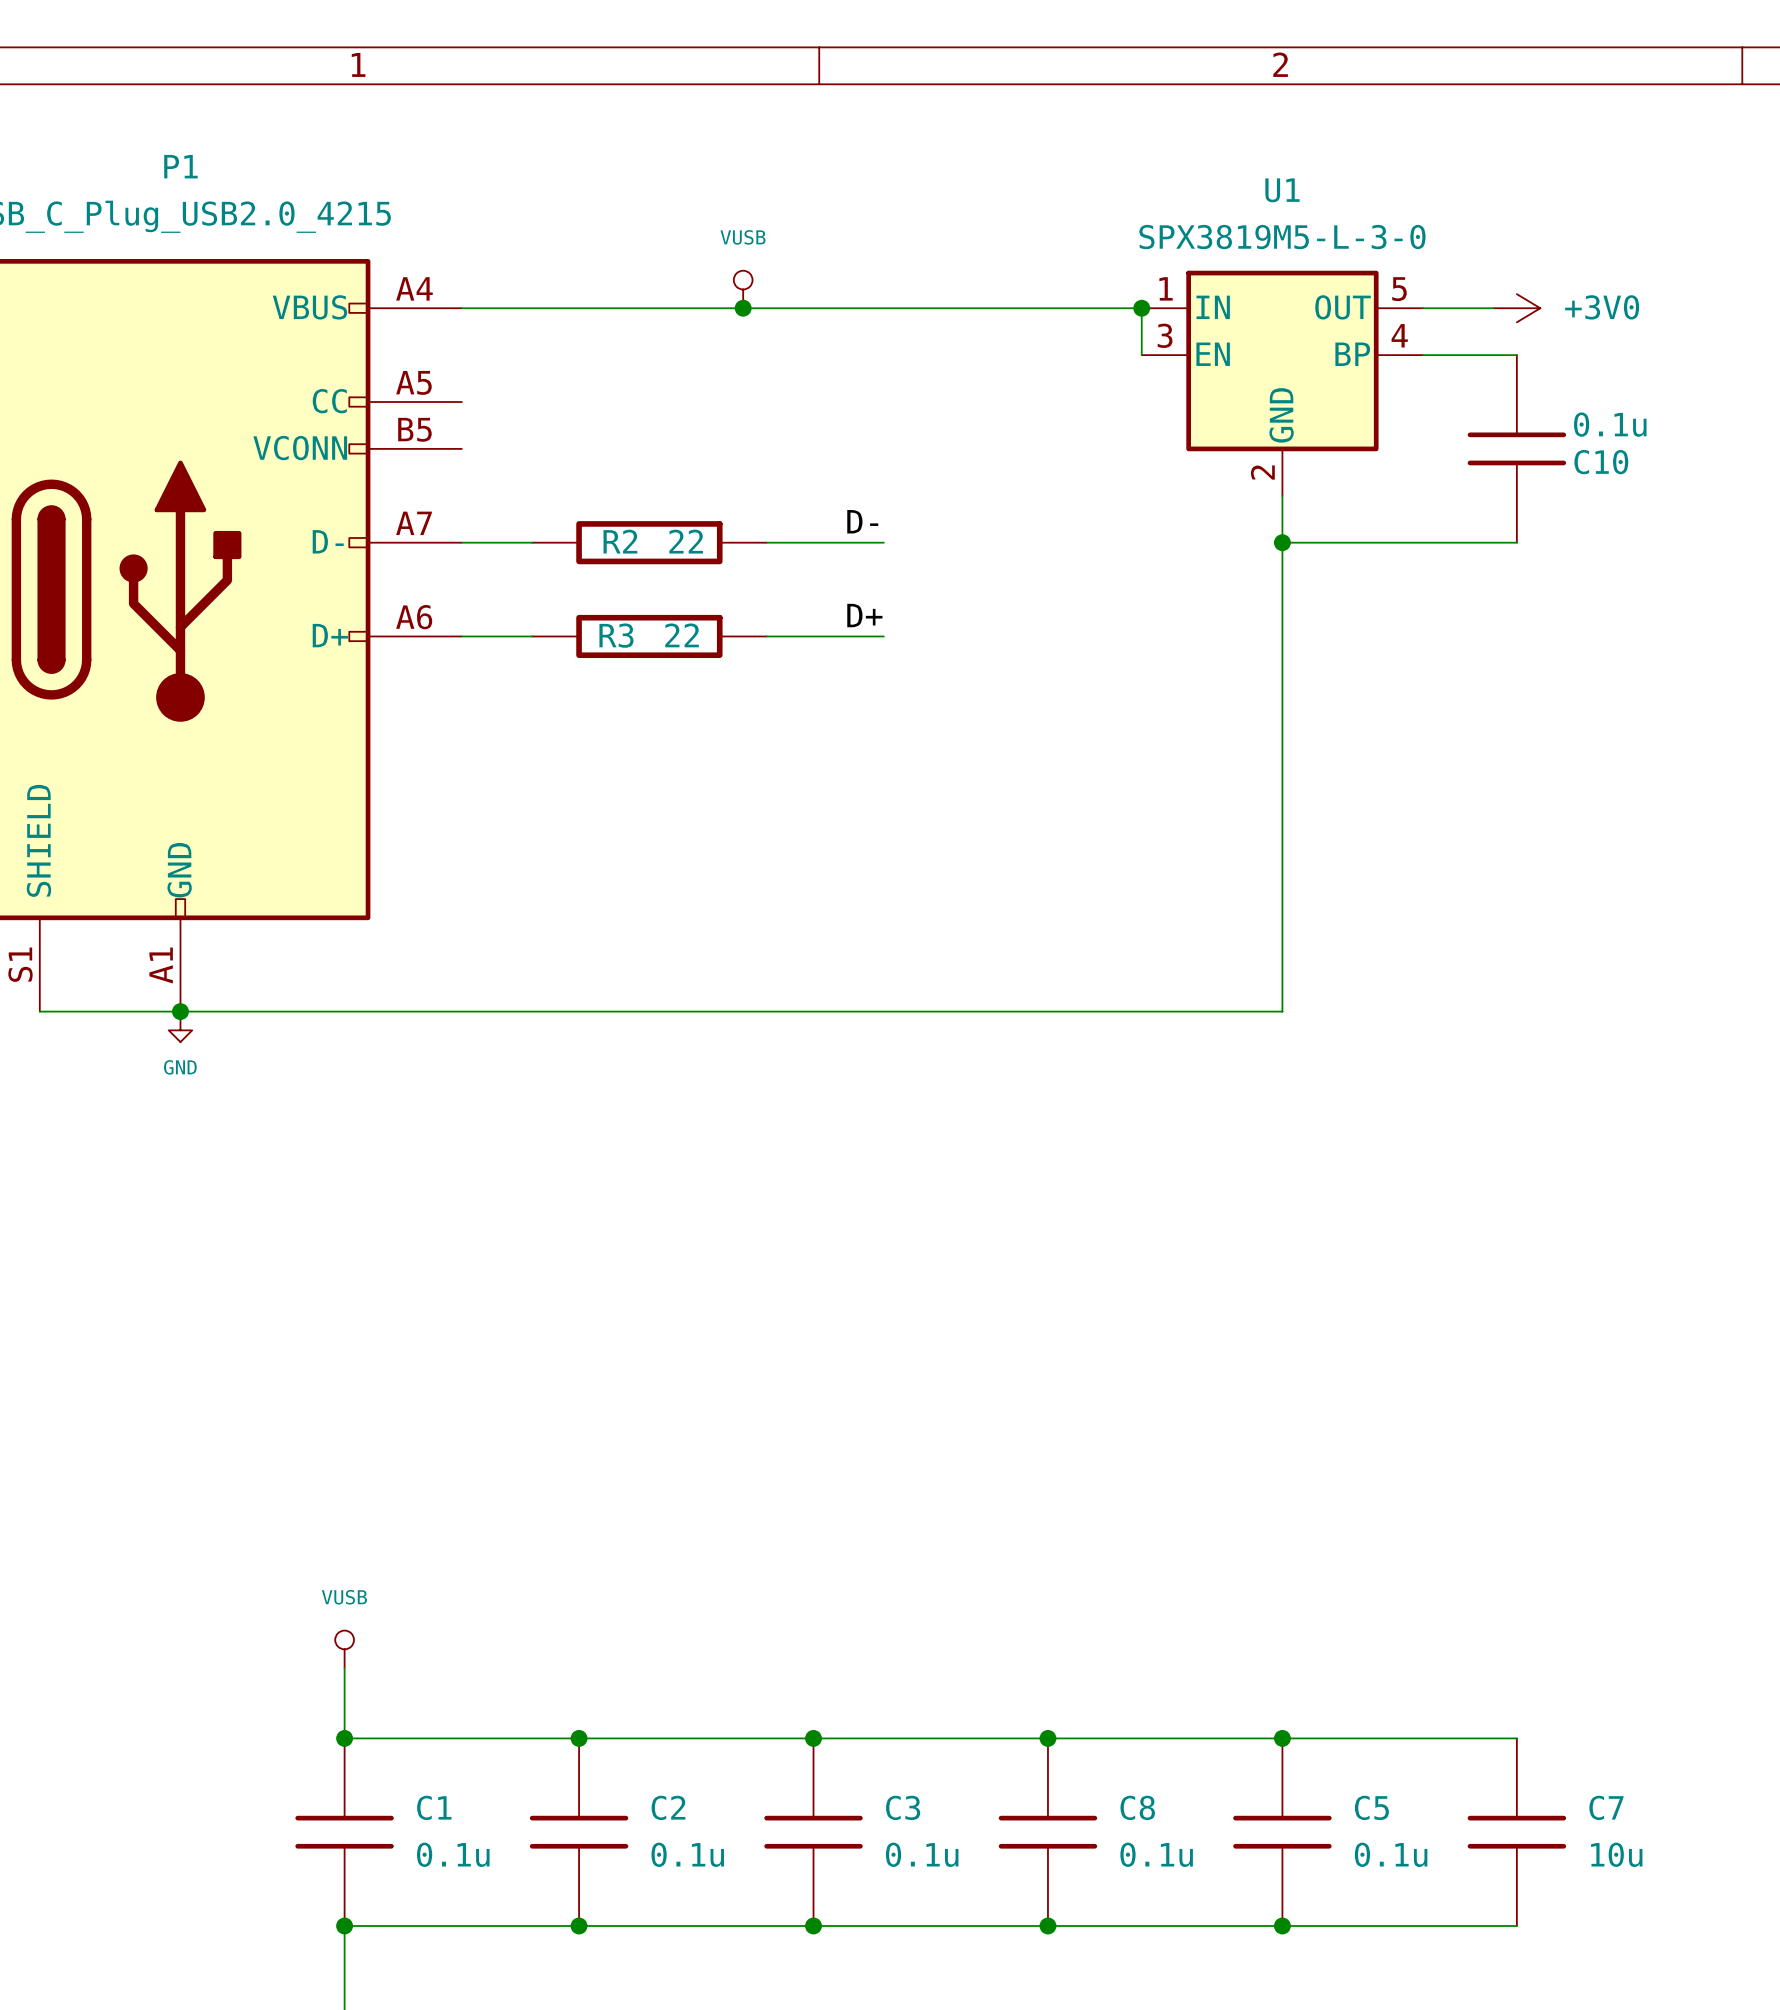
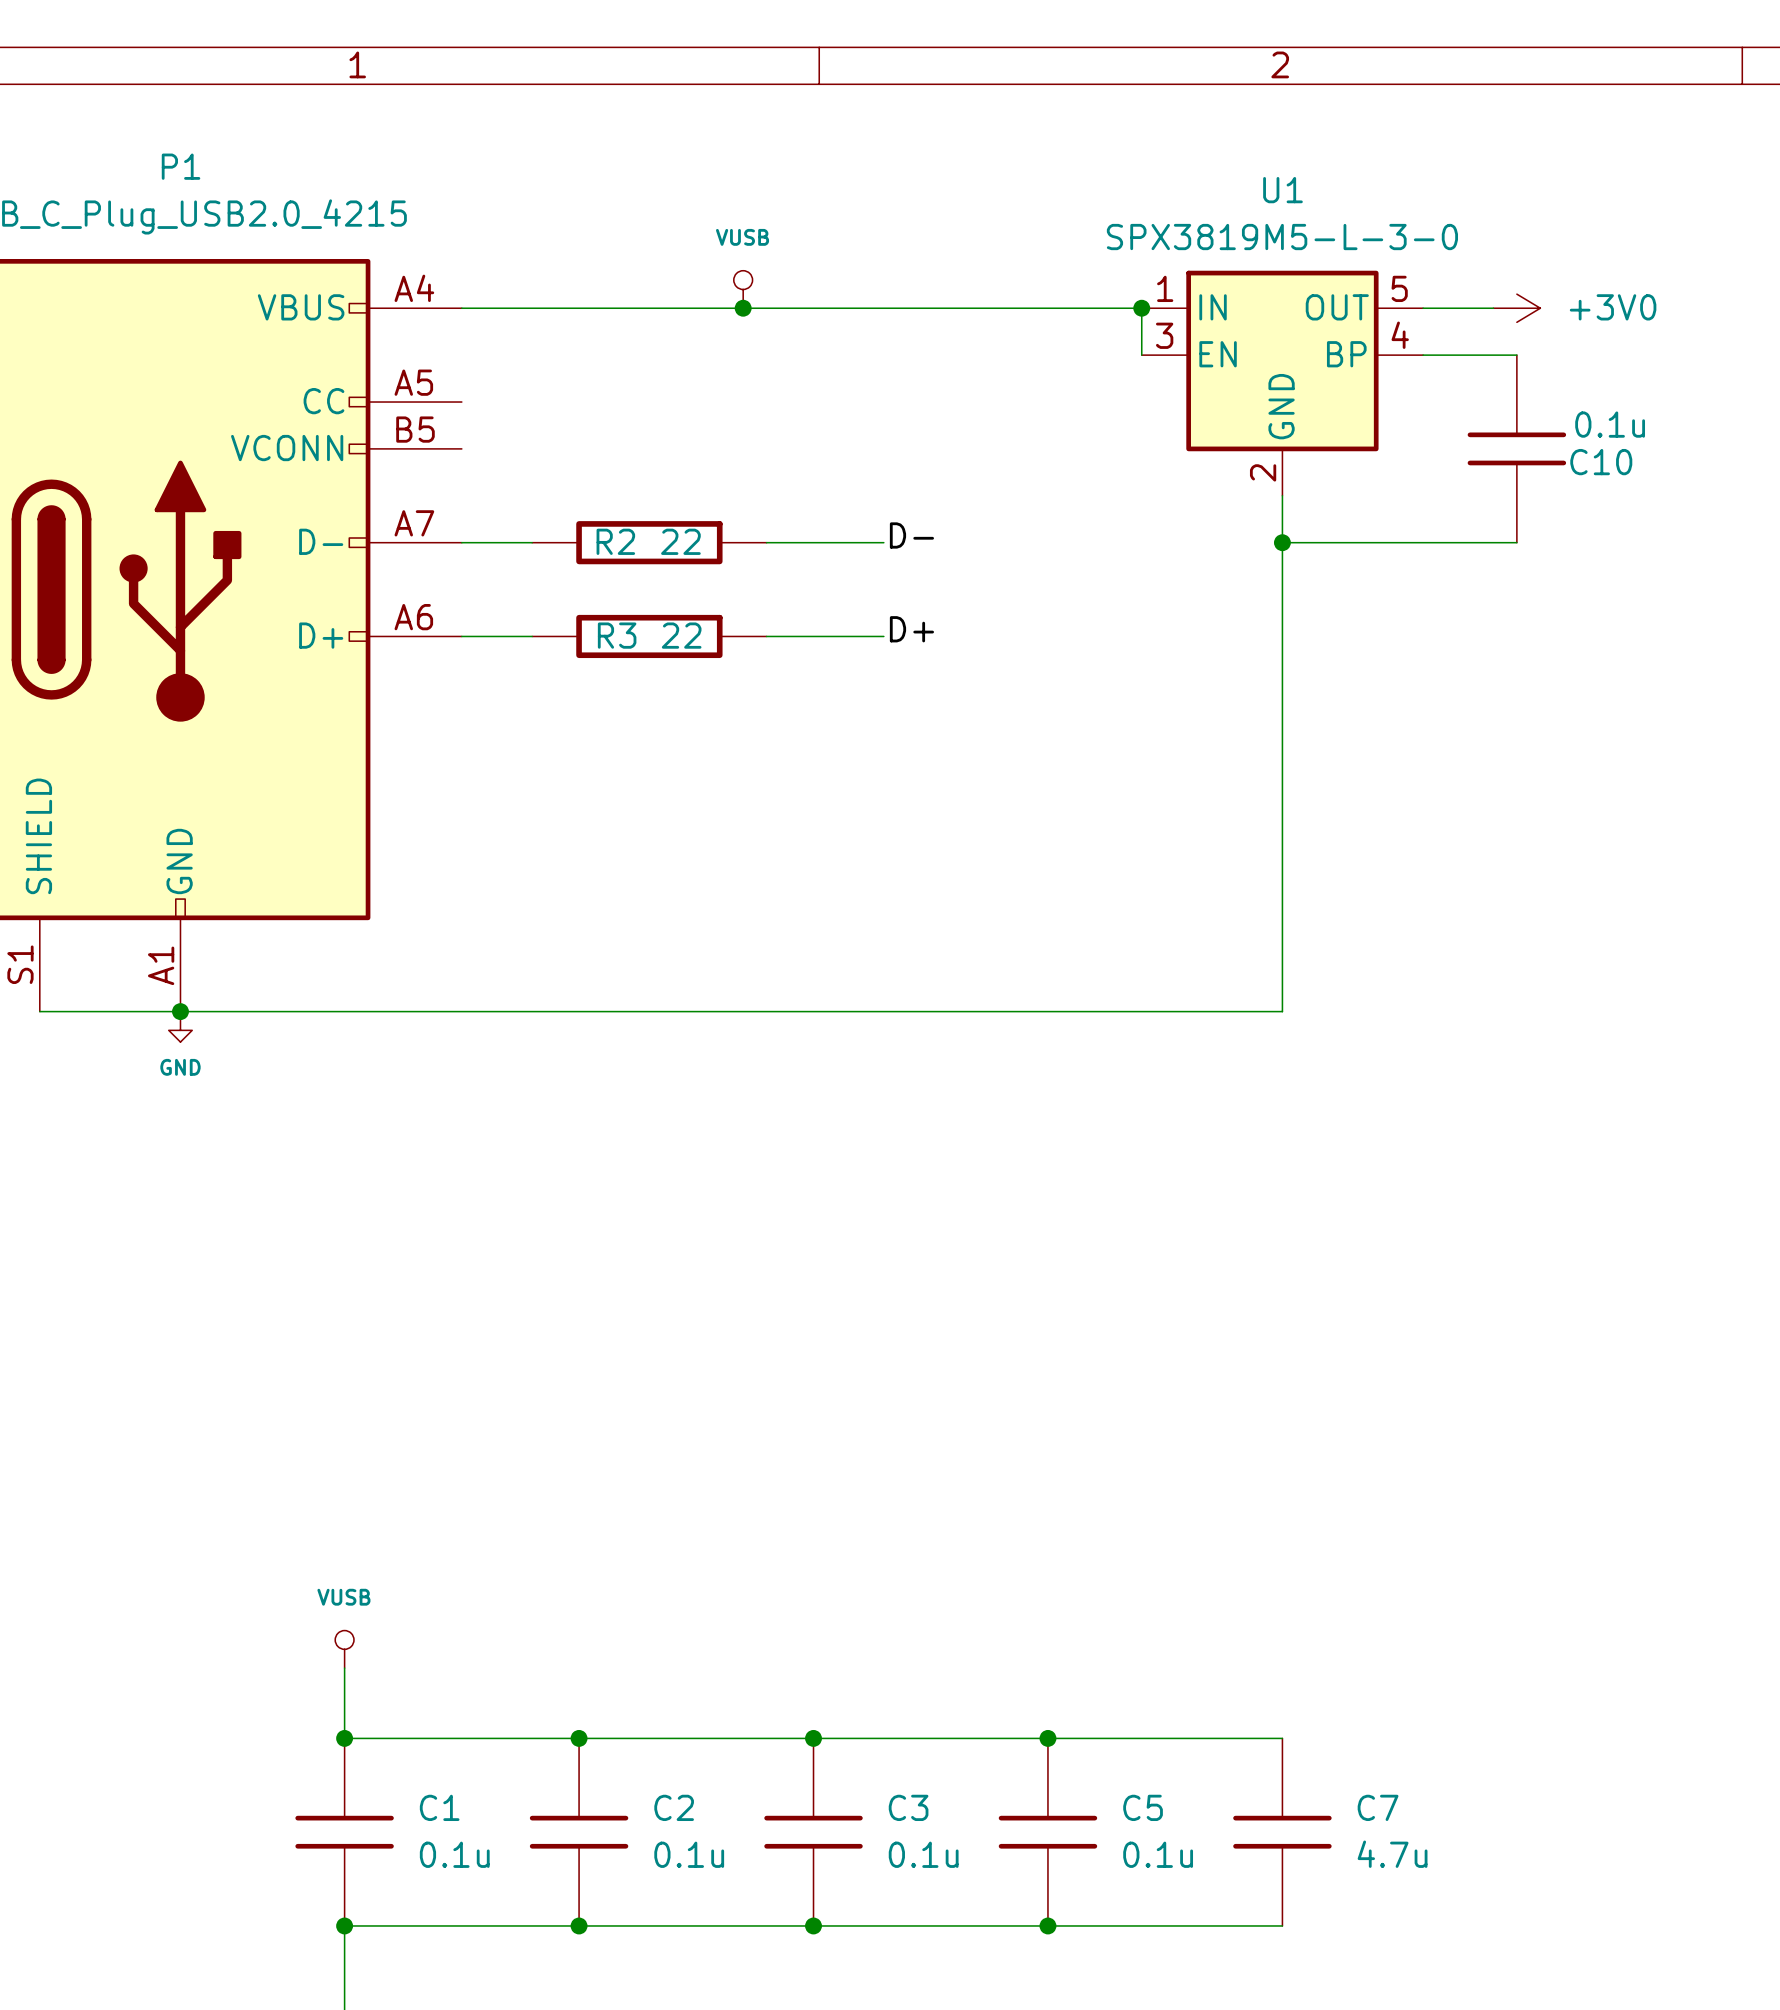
label position: D- (862, 521) -> D- (911, 535)
label position: D+ (864, 615) -> D+ (911, 629)
wire: (1282, 1738) (1516, 1738) -> none
junction: (1282, 1738) -> none
C8 name: C8 (1137, 1807) -> C5 (1143, 1807)
C5 name: C5 (1371, 1807) -> C7 (1378, 1807)
C7: 10u (1516, 1832) -> none
C5 value: 0.1u (1391, 1854) -> 4.7u (1392, 1854)
wire: (1282, 1925) (1516, 1925) -> none
junction: (1282, 1925) -> none

